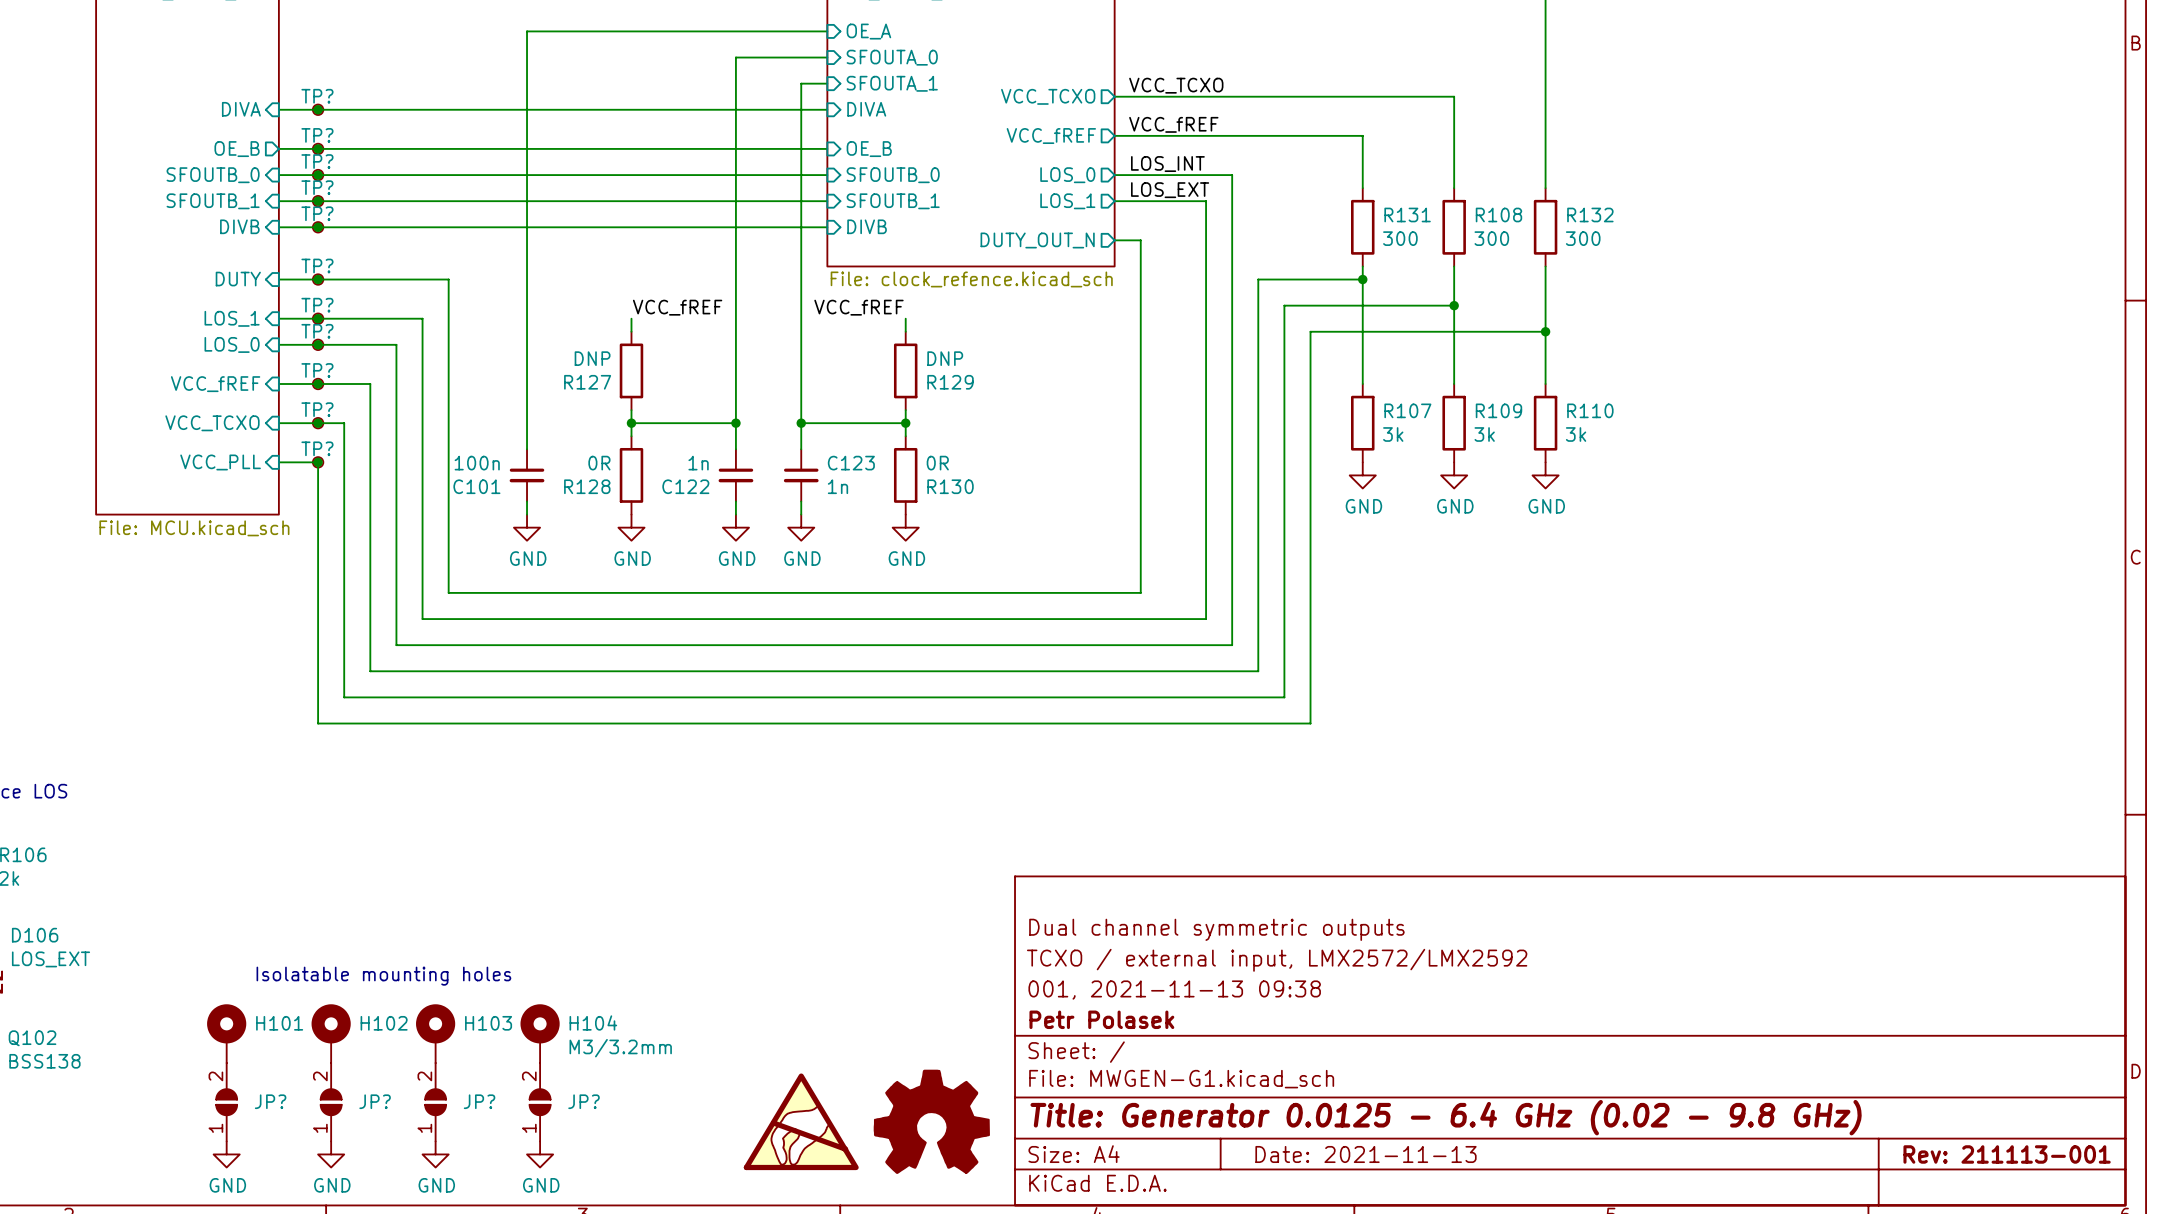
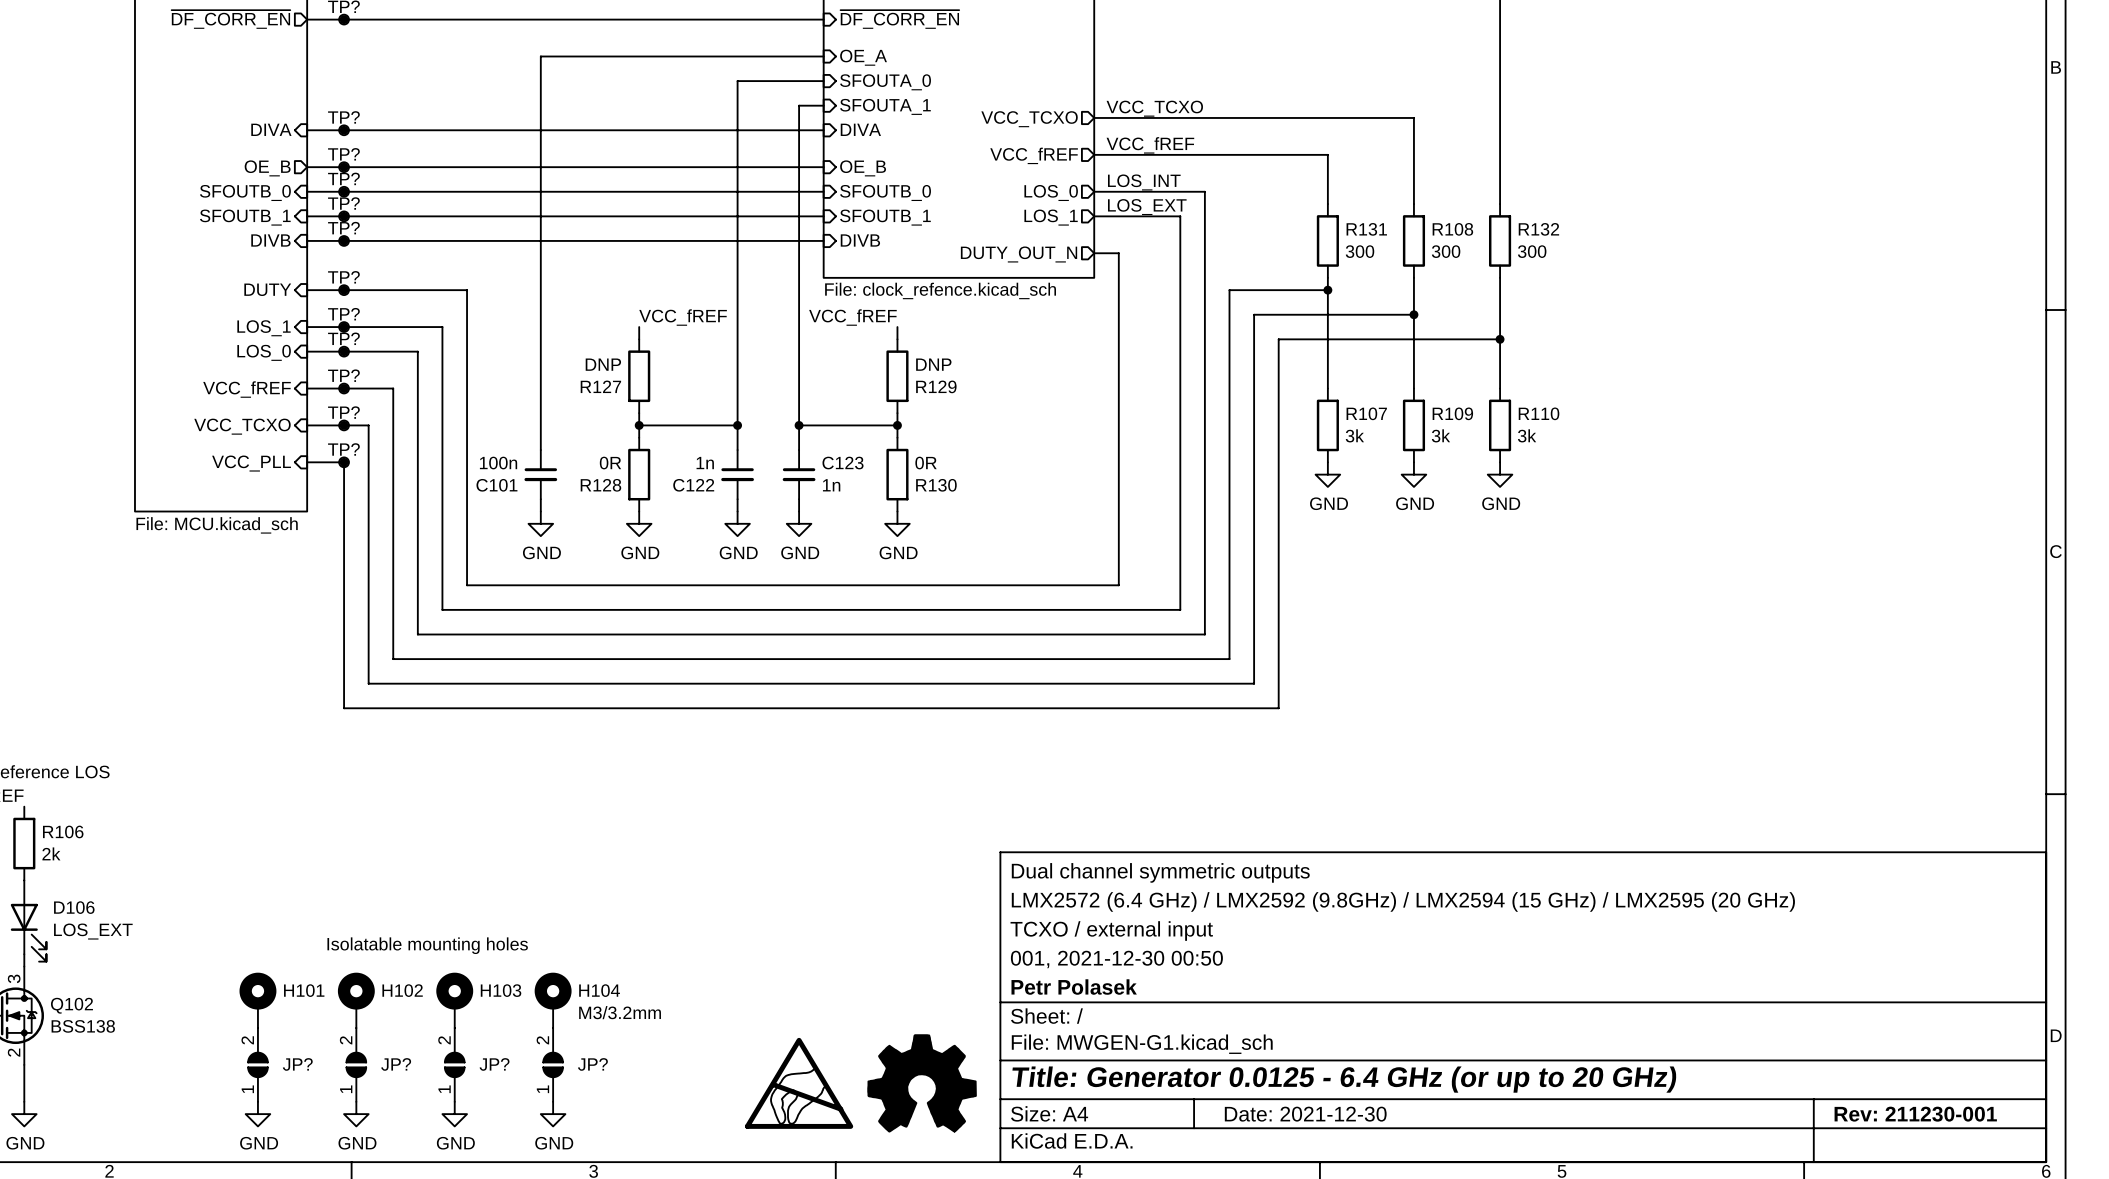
title block: none -> Dual channel symmetric outputs (1160, 872)
title block: Dual channel symmetric outputs (1216, 929) -> LMX2572 (6.4 GHz) / LMX2592 (9.8GHz) / LMX2594 (15 GHz) / LMX2595 (20 GHz) (1403, 901)
title block: TCXO / external input, LMX2572/LMX2592 (1277, 960) -> TCXO / external input (1111, 931)
title block: 001, 2021-11-13 09:38 (1174, 990) -> 001, 2021-12-30 00:50 (1116, 959)
title block: Title: Generator 0.0125 - 6.4 GHz (0.02 - 9.8 GHz) (1446, 1117) -> Title: Generator 0.0125 - 6.4 GHz (or up to 20 GHz) (1344, 1079)
title block: Date: 2021-11-13 (1366, 1154) -> Date: 2021-12-30 (1305, 1114)
title block: Rev: 211113-001 (2007, 1154) -> Rev: 211230-001 (1915, 1114)

